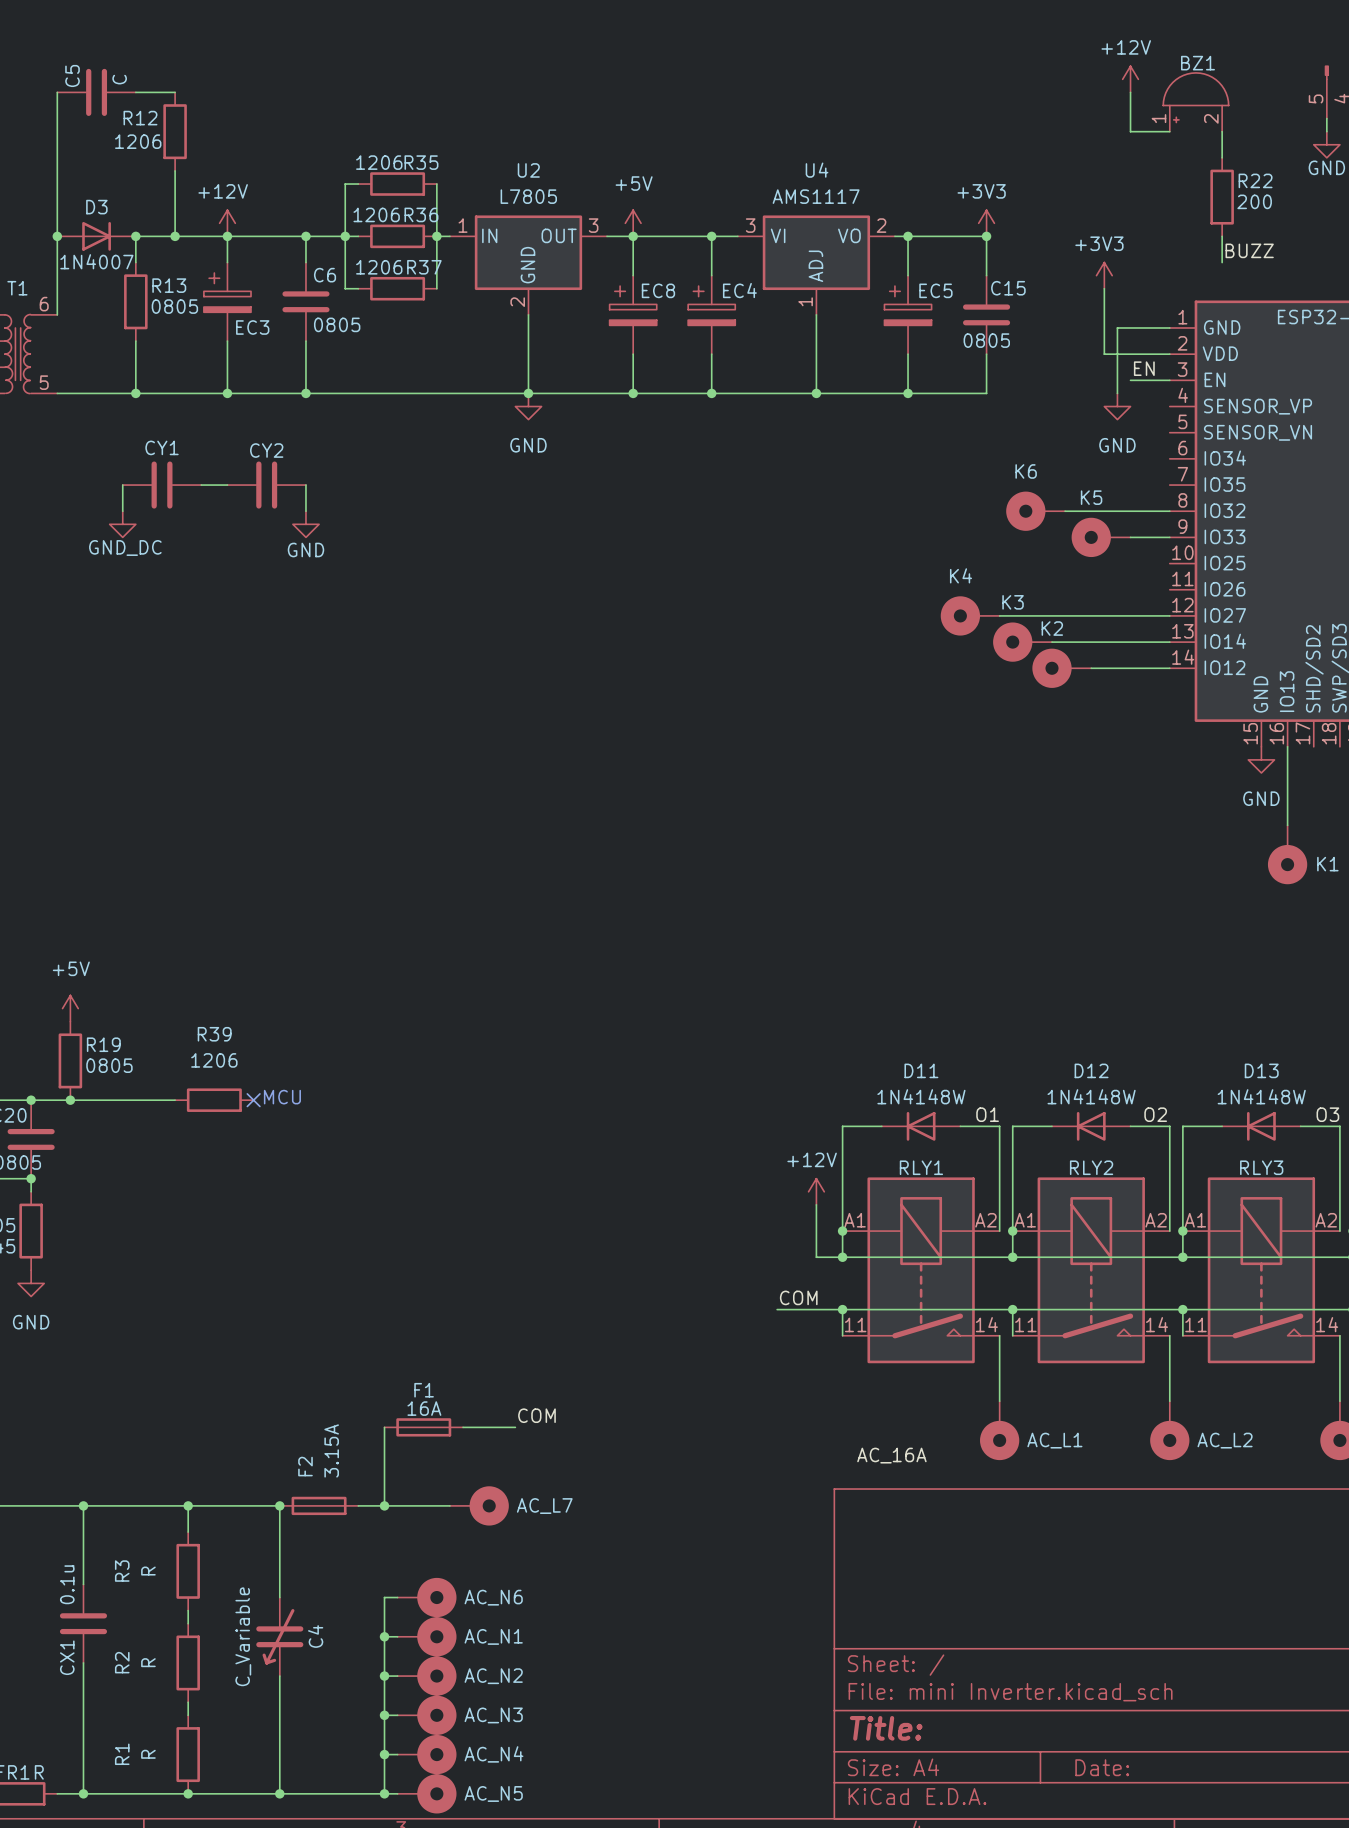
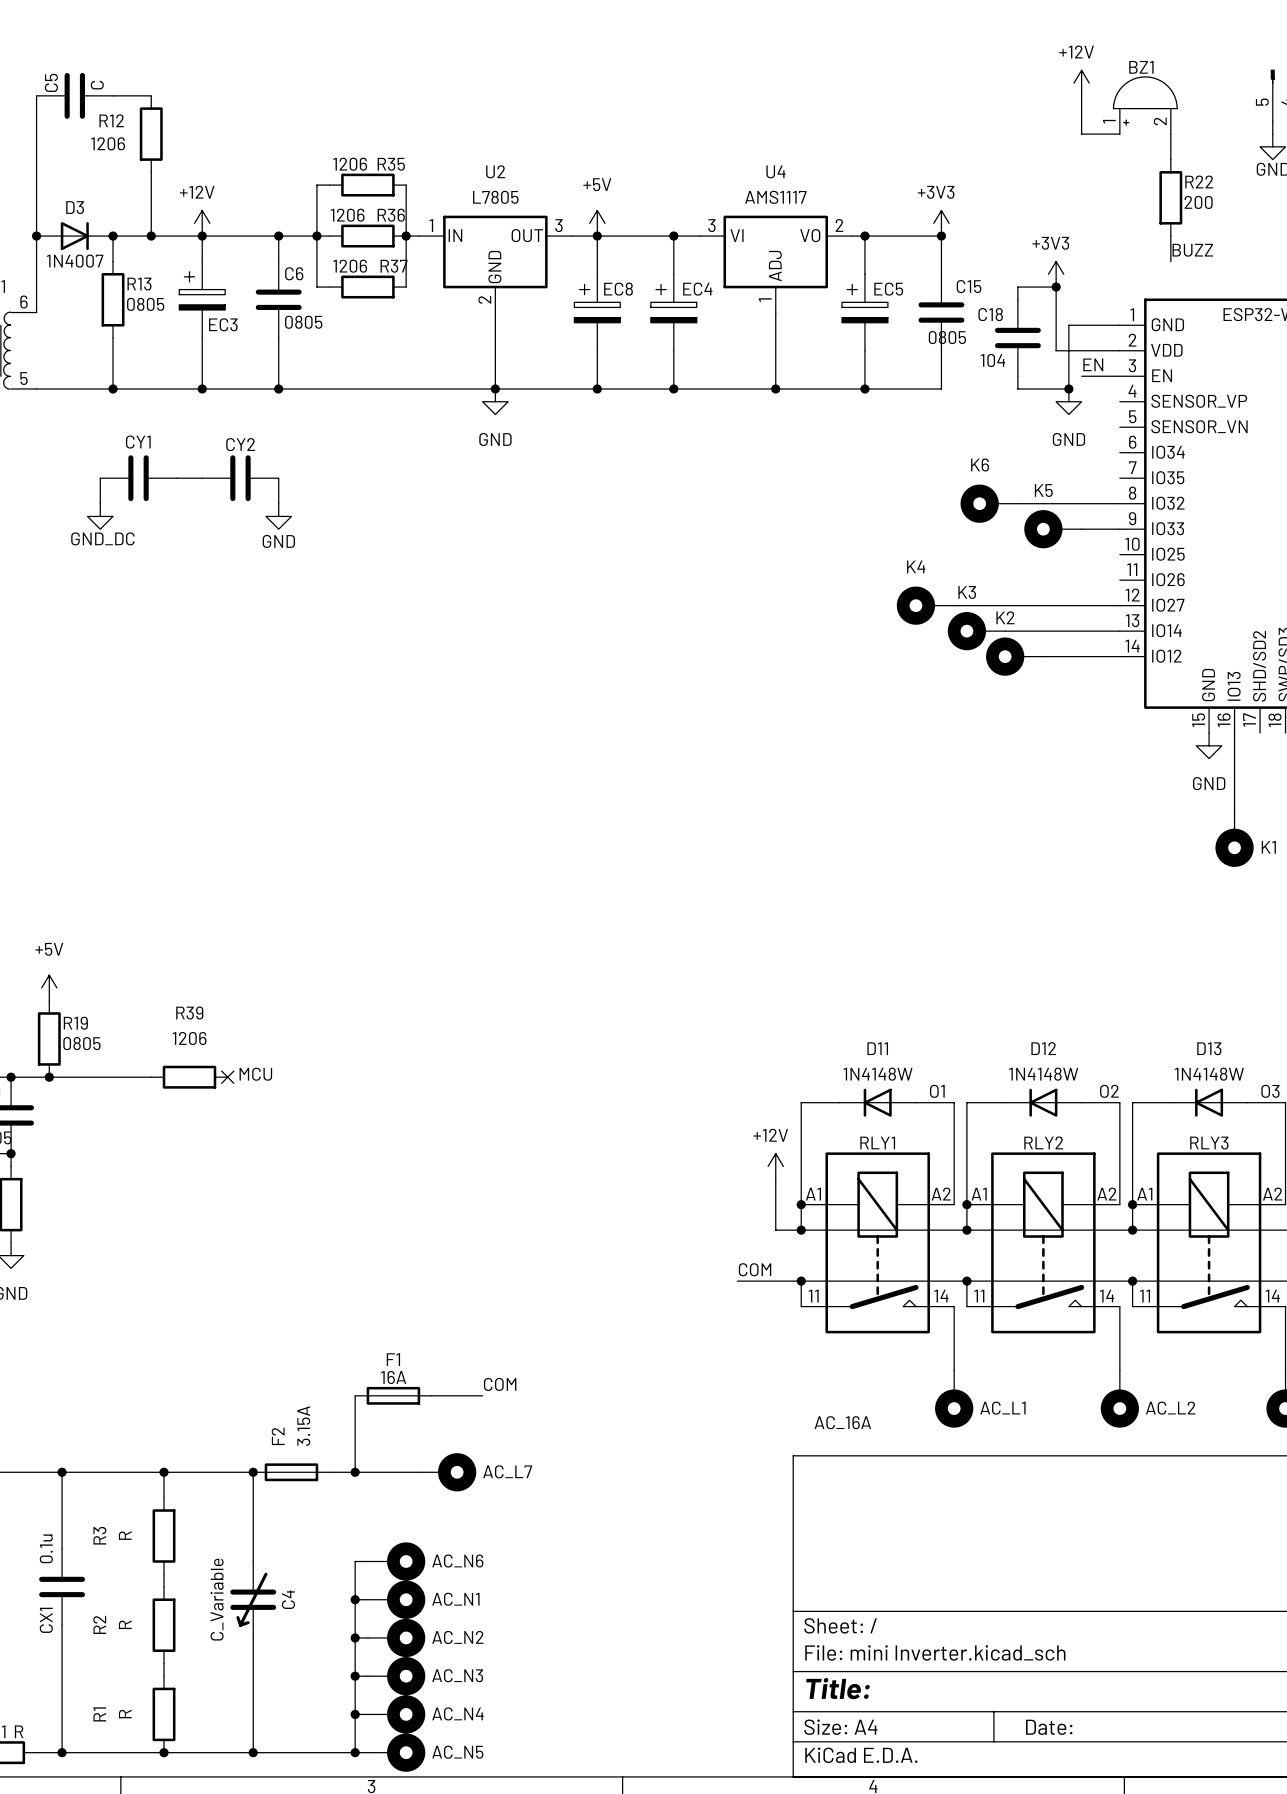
wire: none -> (1056, 287) (1017, 287) (1017, 299)
junction: none -> (1056, 287)
C18: none -> 104 (1017, 338)
wire: none -> (1017, 376) (1017, 388) (1068, 388)
junction: none -> (1068, 388)

